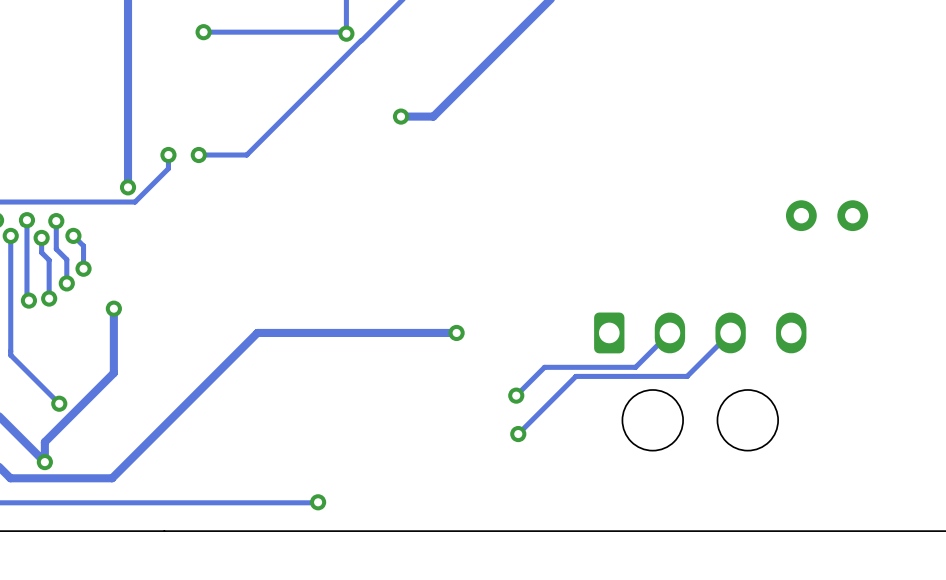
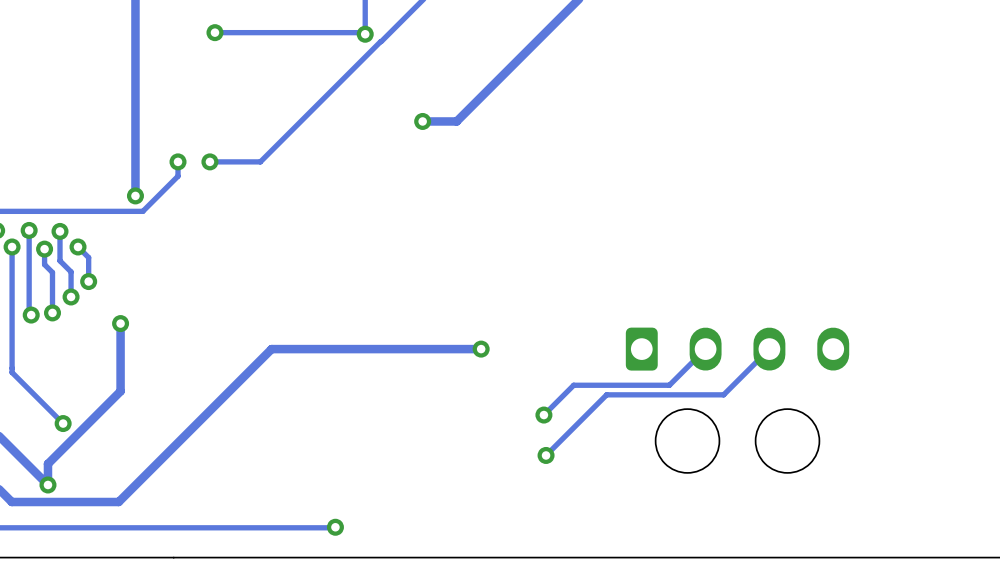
part: (827, 215) -> none

